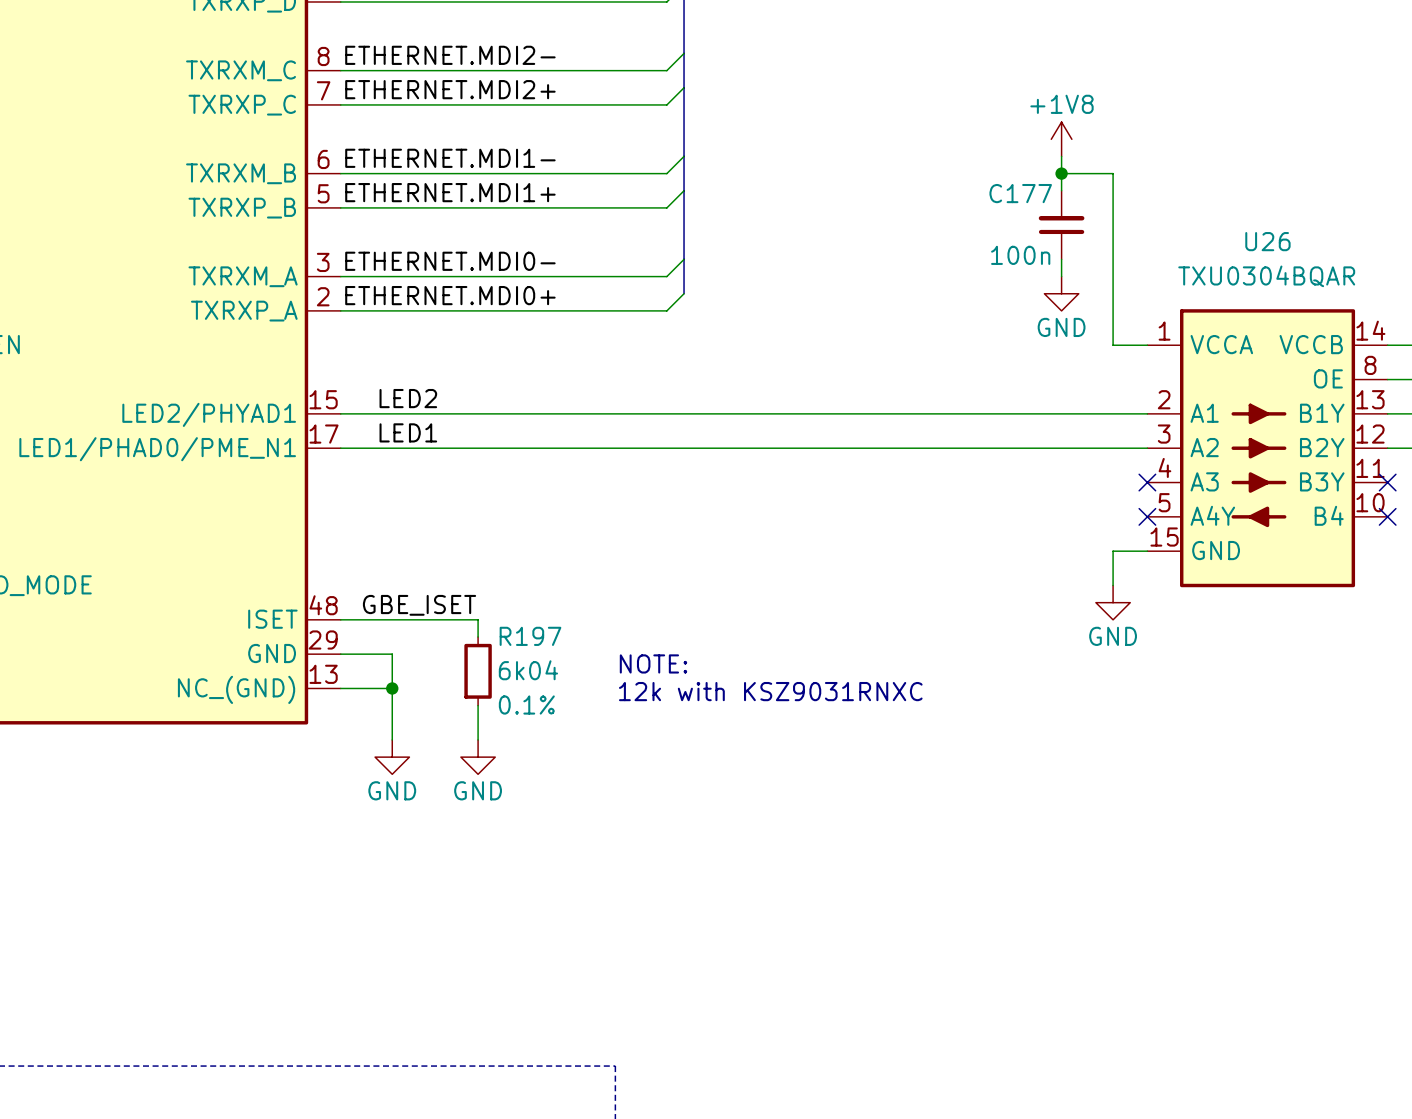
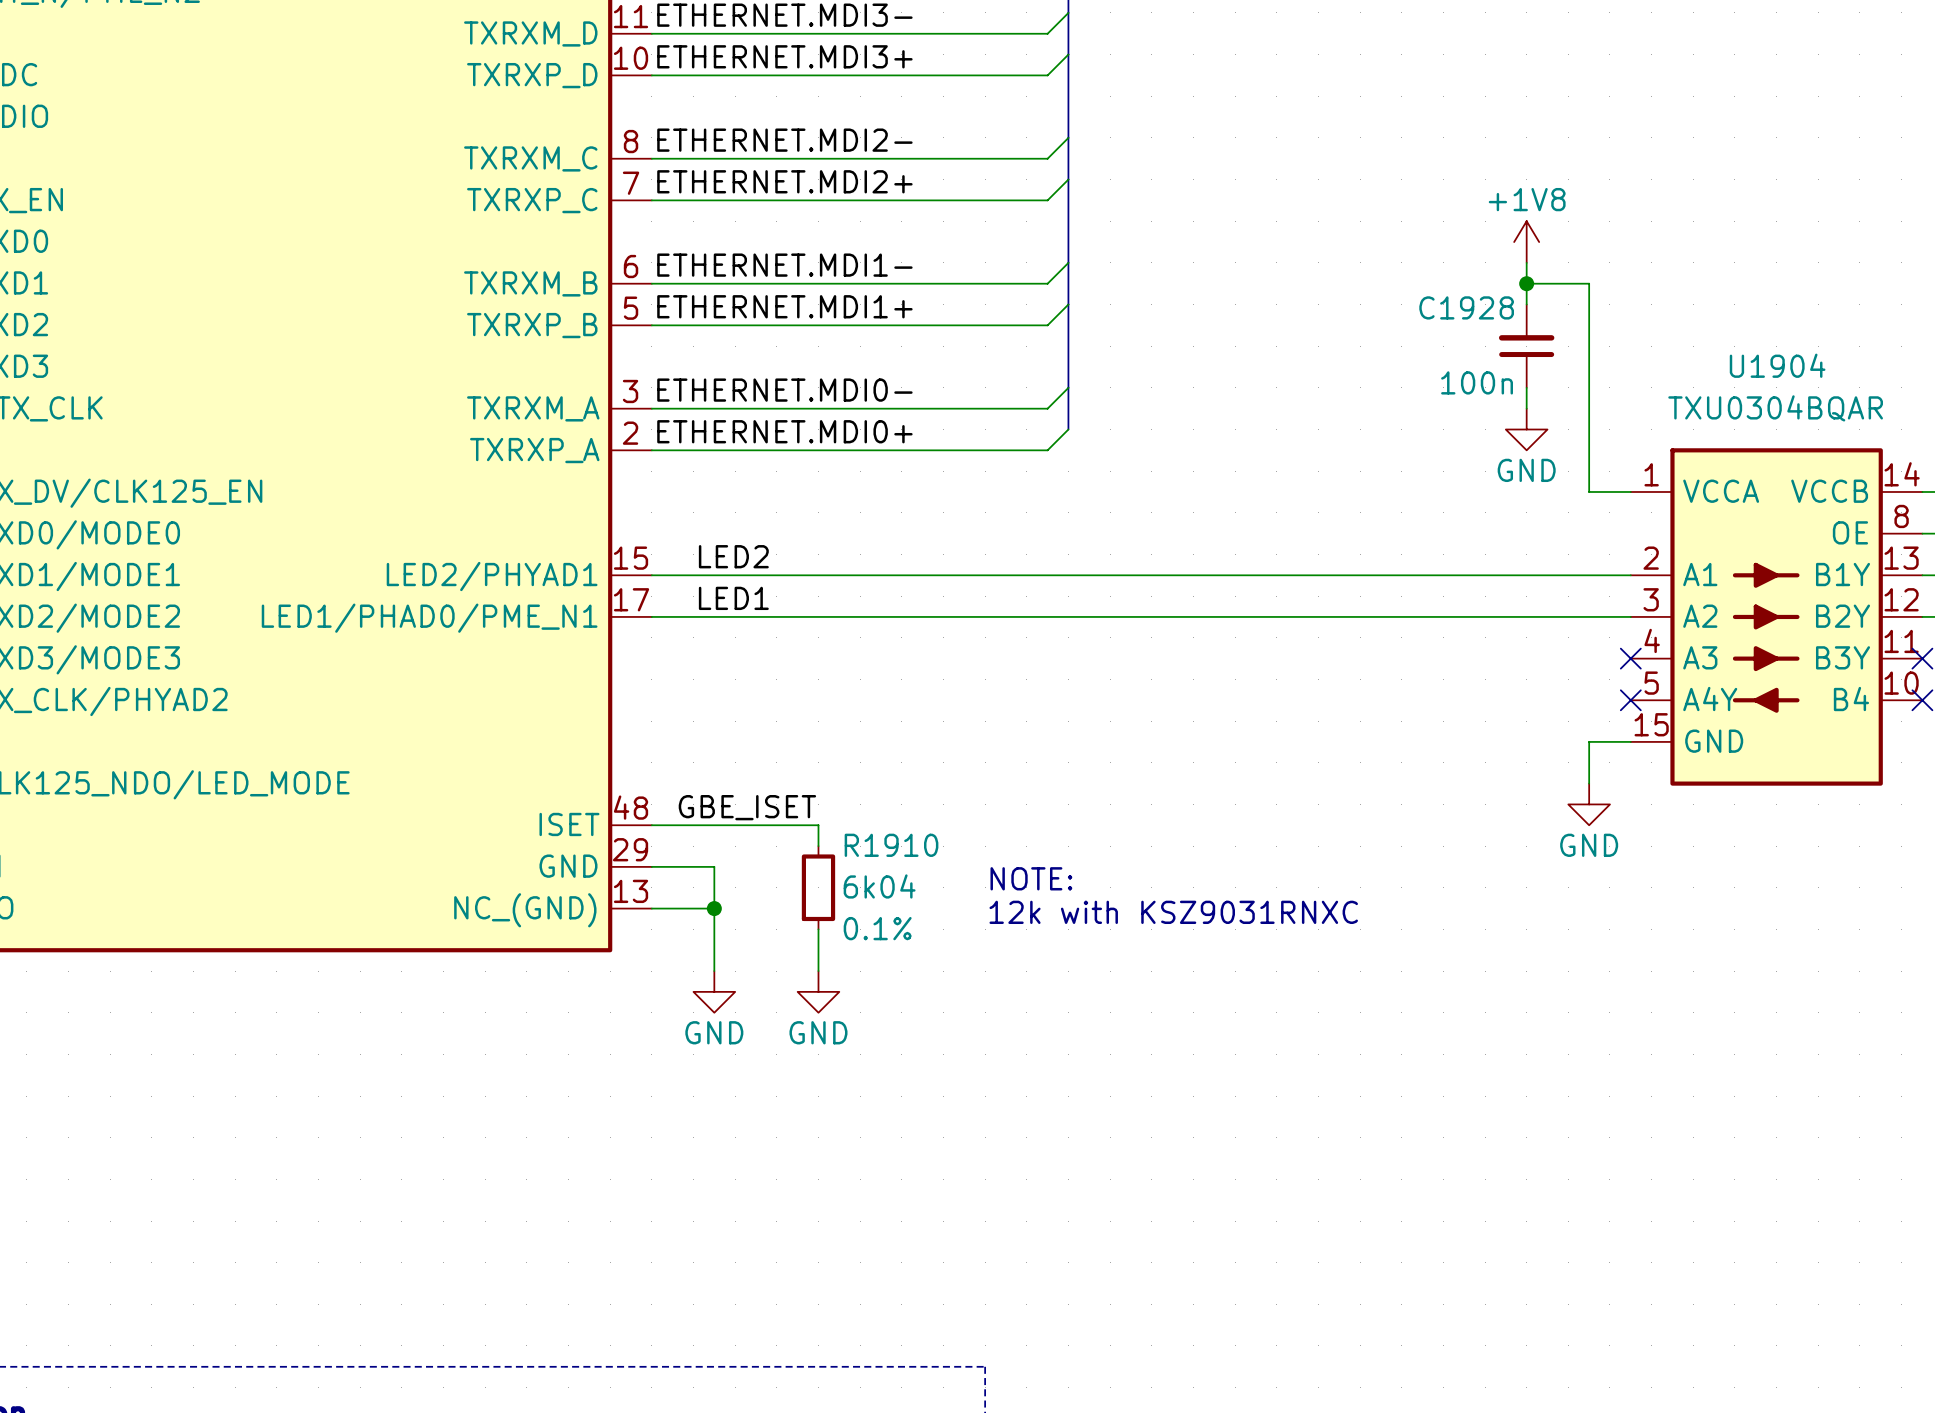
C177 name: C177 (1020, 193) -> C1928 (1466, 307)
U26 name: U26 (1267, 241) -> U1904 (1777, 365)
R197 name: R197 (530, 636) -> R1910 (891, 845)

